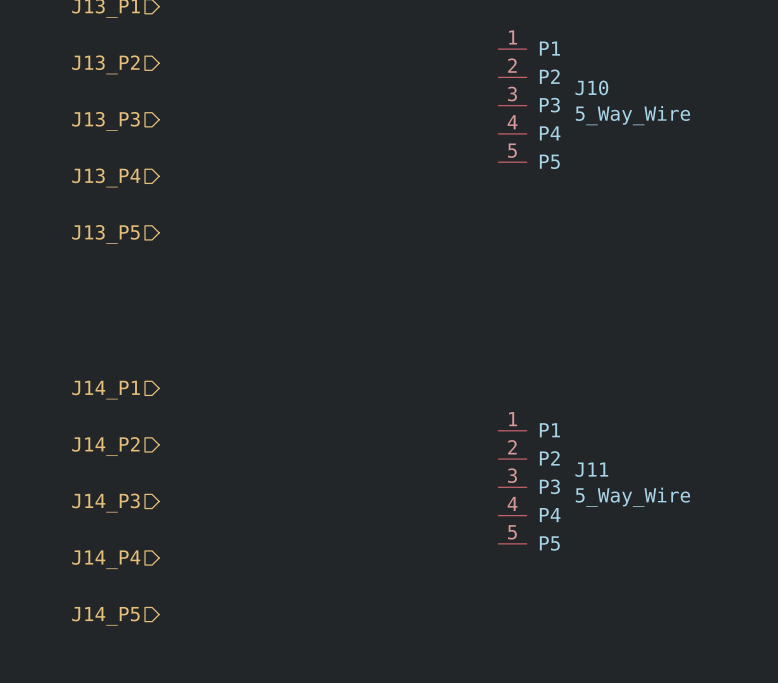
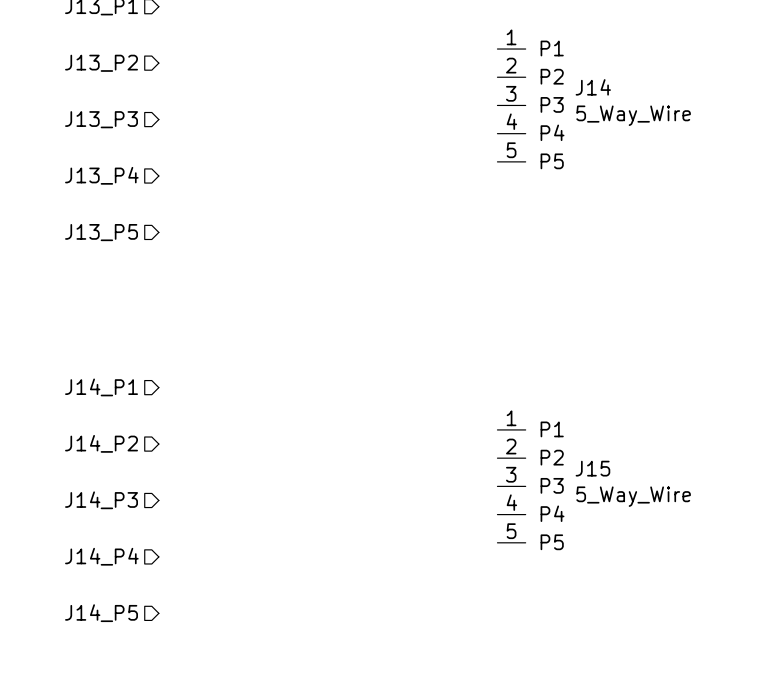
J10 name: J10 (591, 87) -> J14 (593, 87)
J11 name: J11 (591, 469) -> J15 (592, 468)

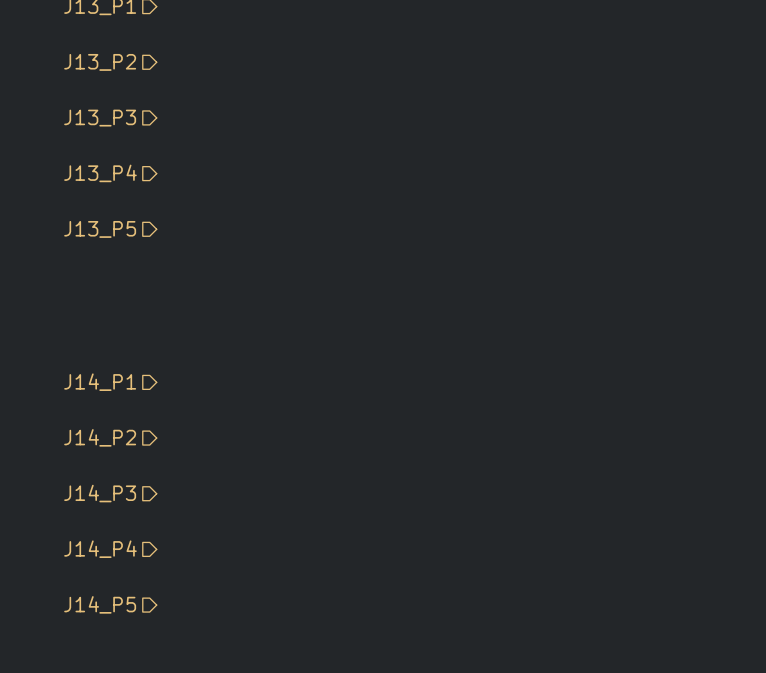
J14: 5_Way_Wire (511, 105) -> none
J15: 5_Way_Wire (511, 486) -> none

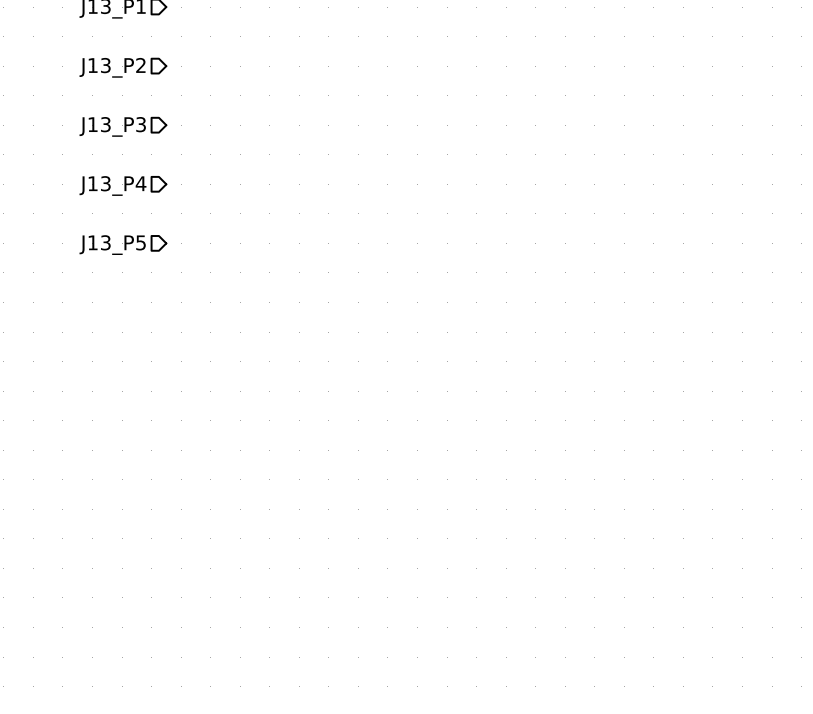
hierarchical label: J14_P1 (100, 382) -> none
hierarchical label: J14_P2 (100, 437) -> none
hierarchical label: J14_P3 (100, 493) -> none
hierarchical label: J14_P4 (100, 549) -> none
hierarchical label: J14_P5 (100, 604) -> none

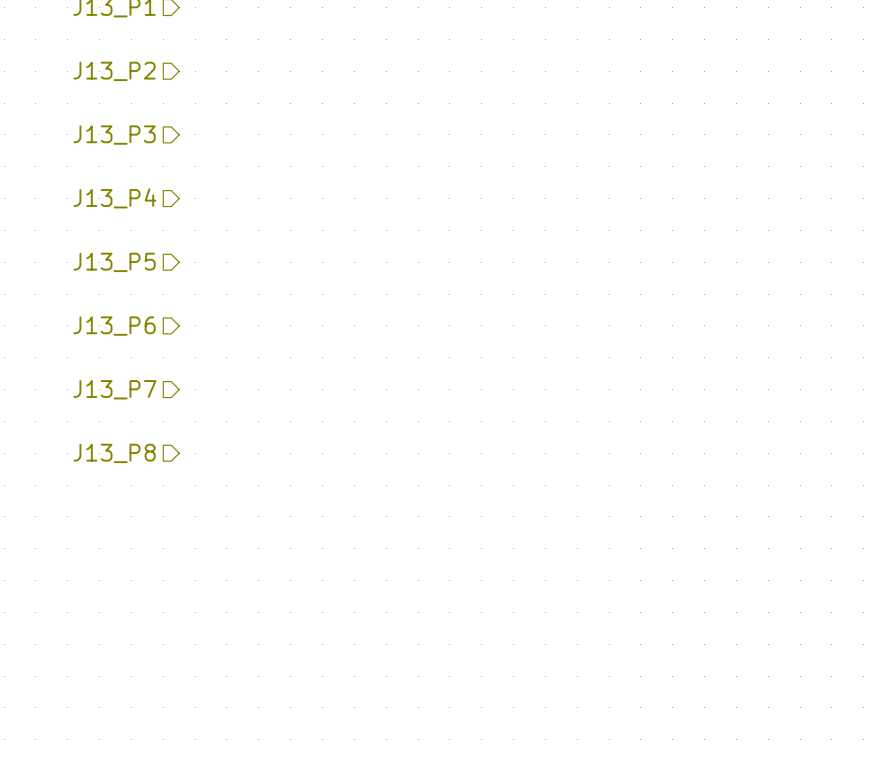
hierarchical label: none -> J13_P6 (114, 326)
hierarchical label: none -> J13_P7 (114, 389)
hierarchical label: none -> J13_P8 (114, 453)

